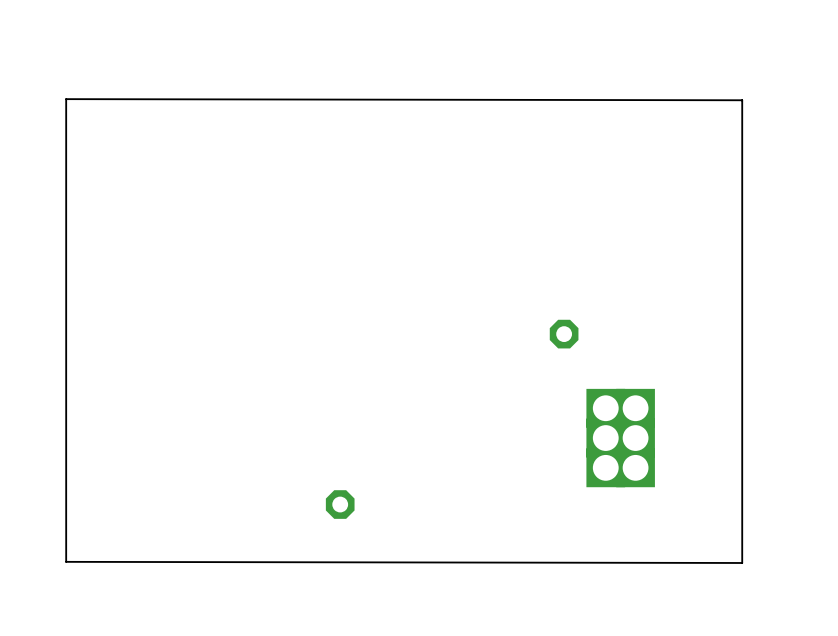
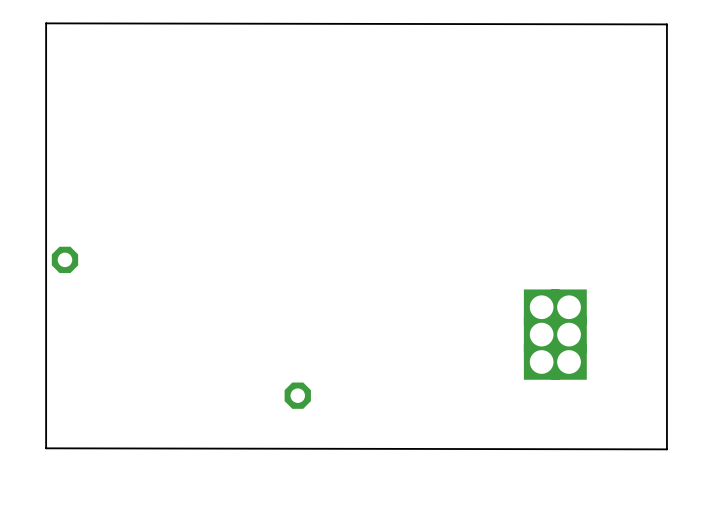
part position: (564, 334) -> (64, 259)

